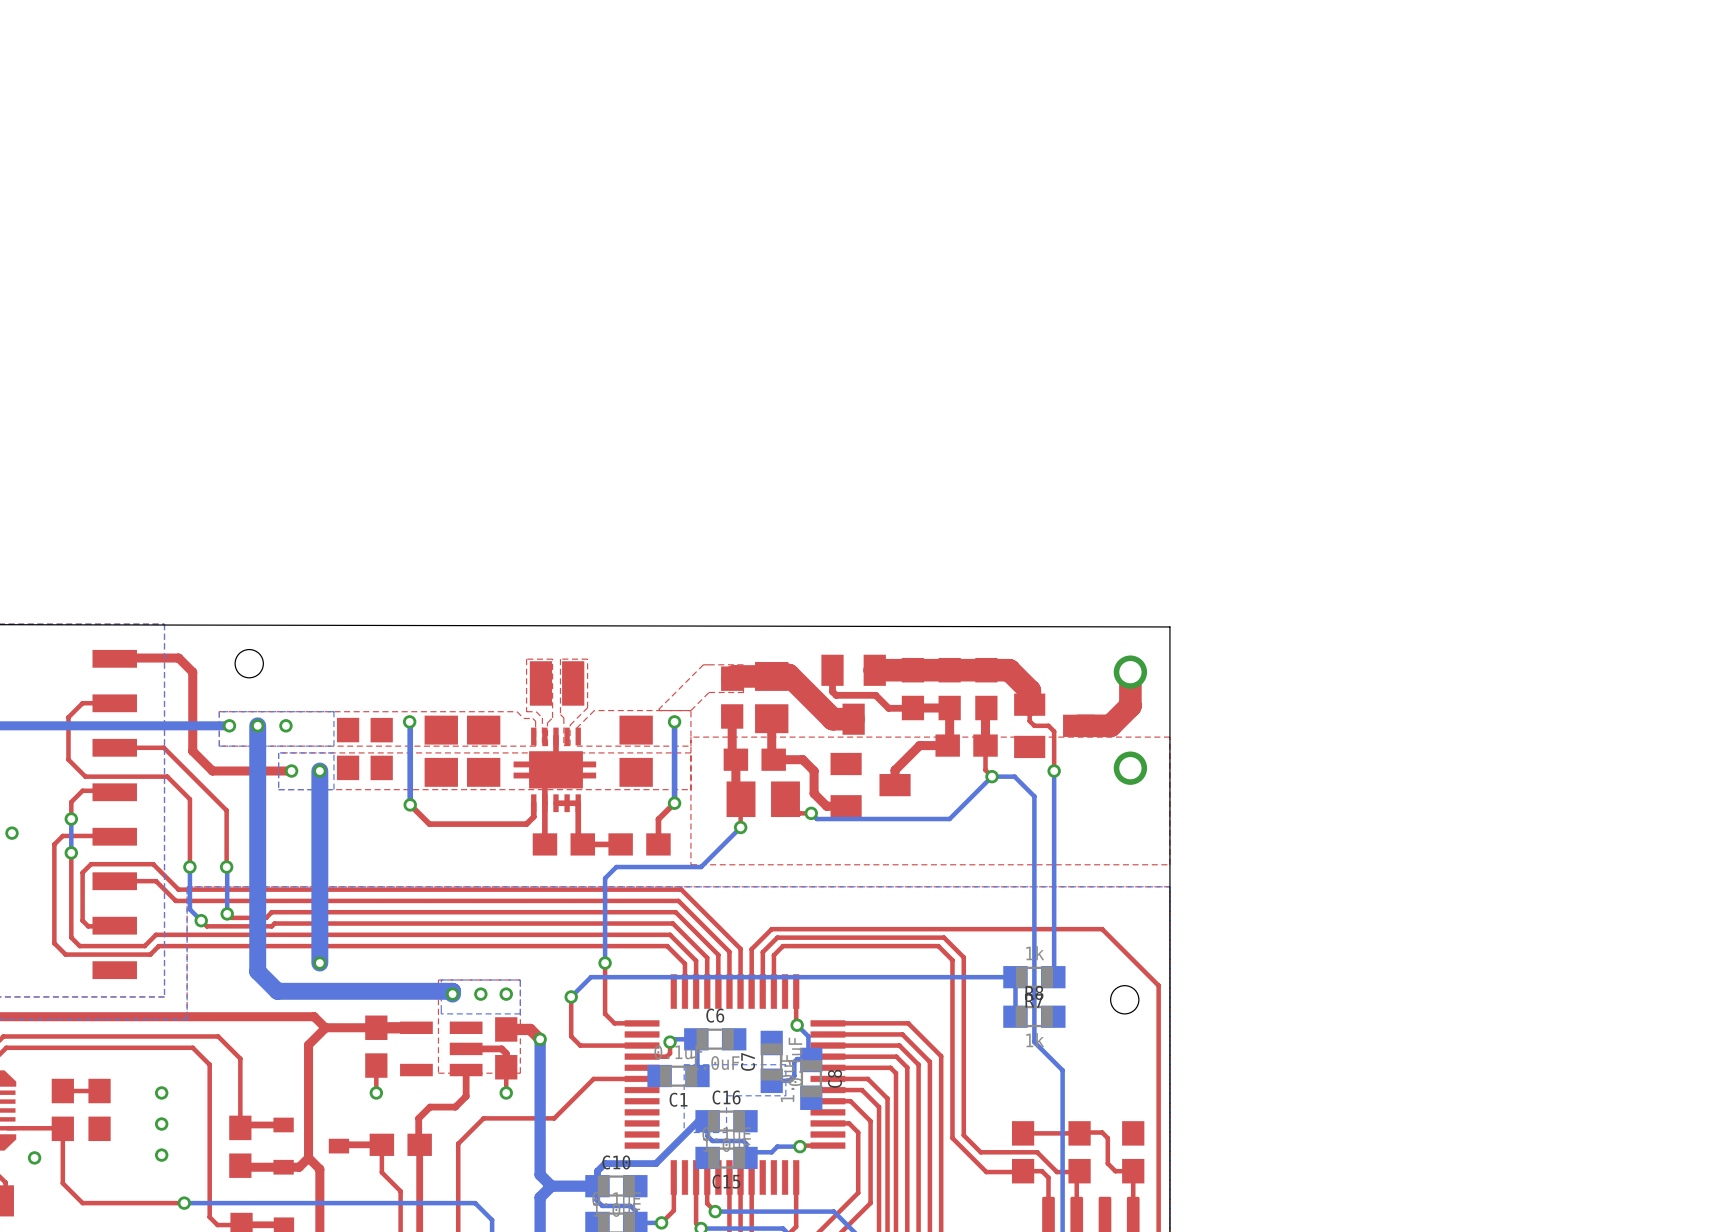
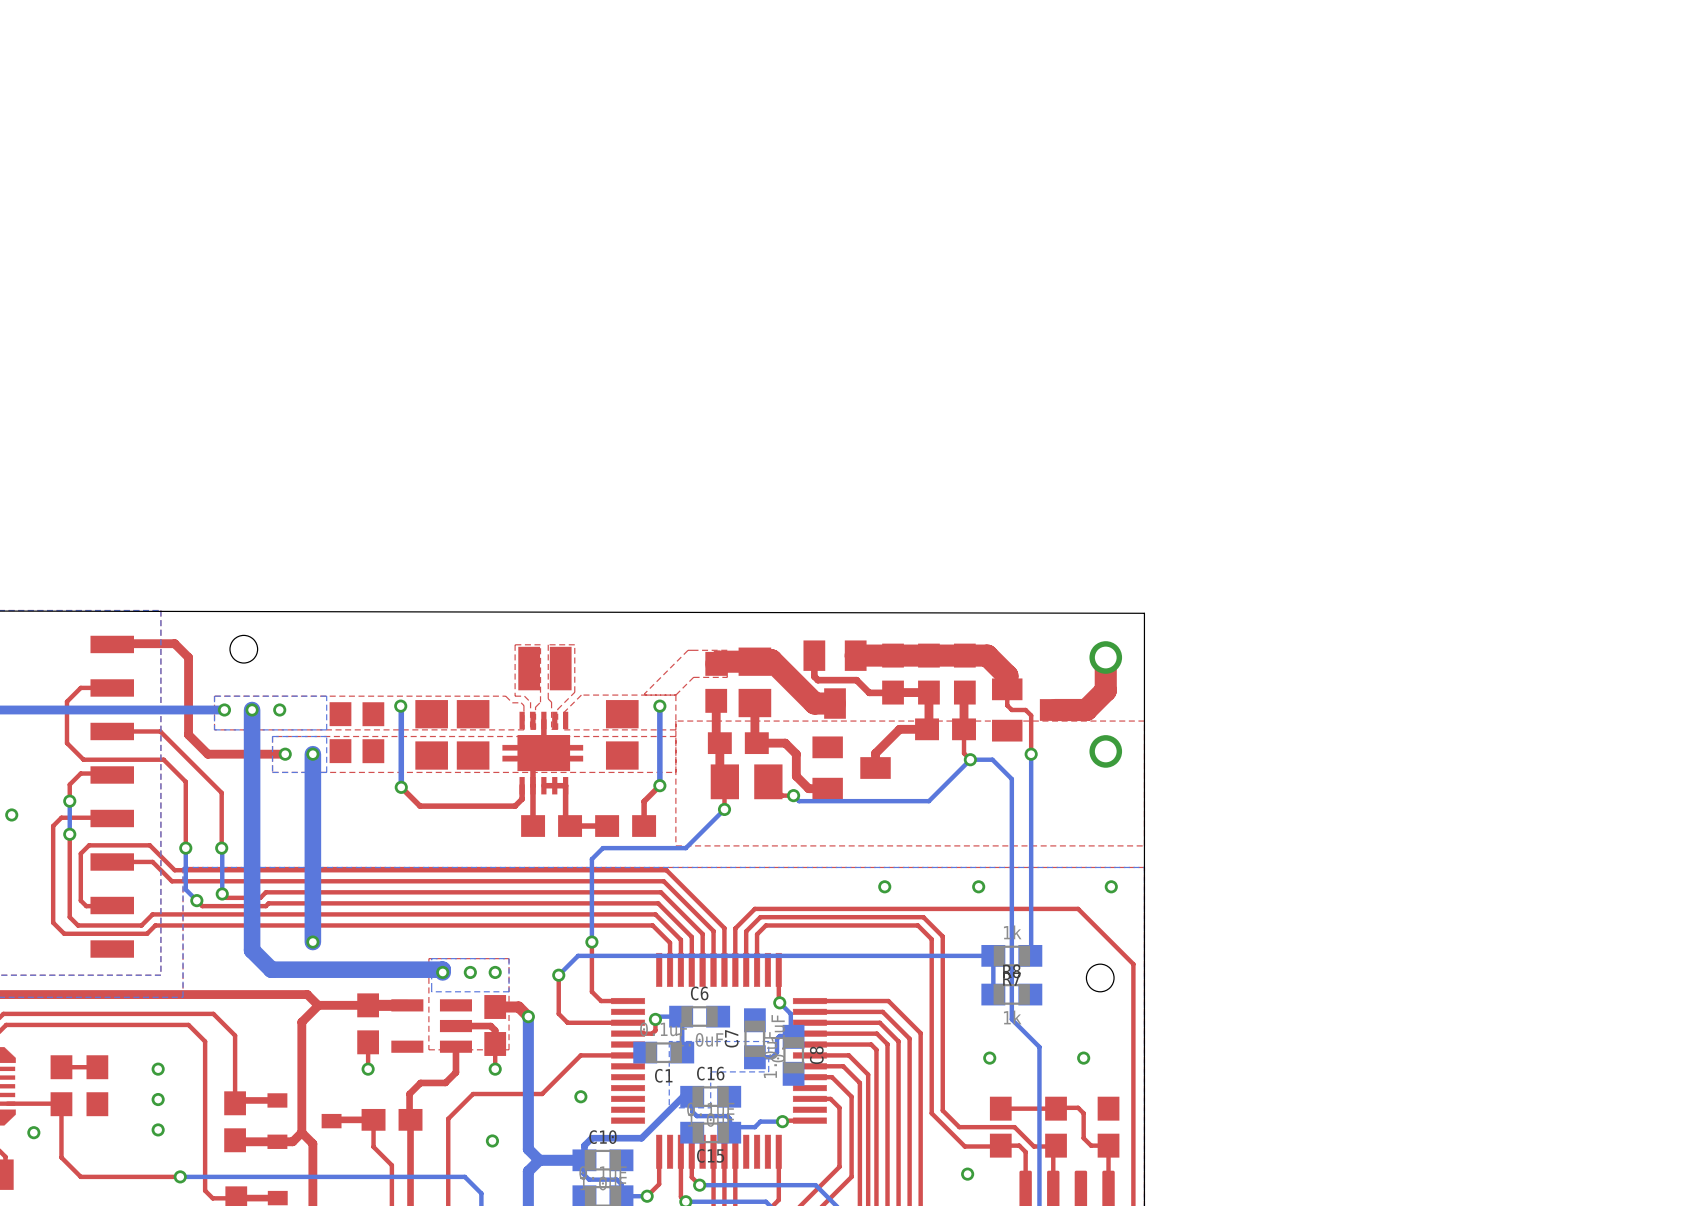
via: none -> (884, 886)
via: none -> (978, 886)
via: none -> (1111, 886)
via: none -> (989, 1058)
via: none -> (1083, 1058)
via: none -> (580, 1096)
via: none -> (492, 1140)
via: none -> (967, 1174)

